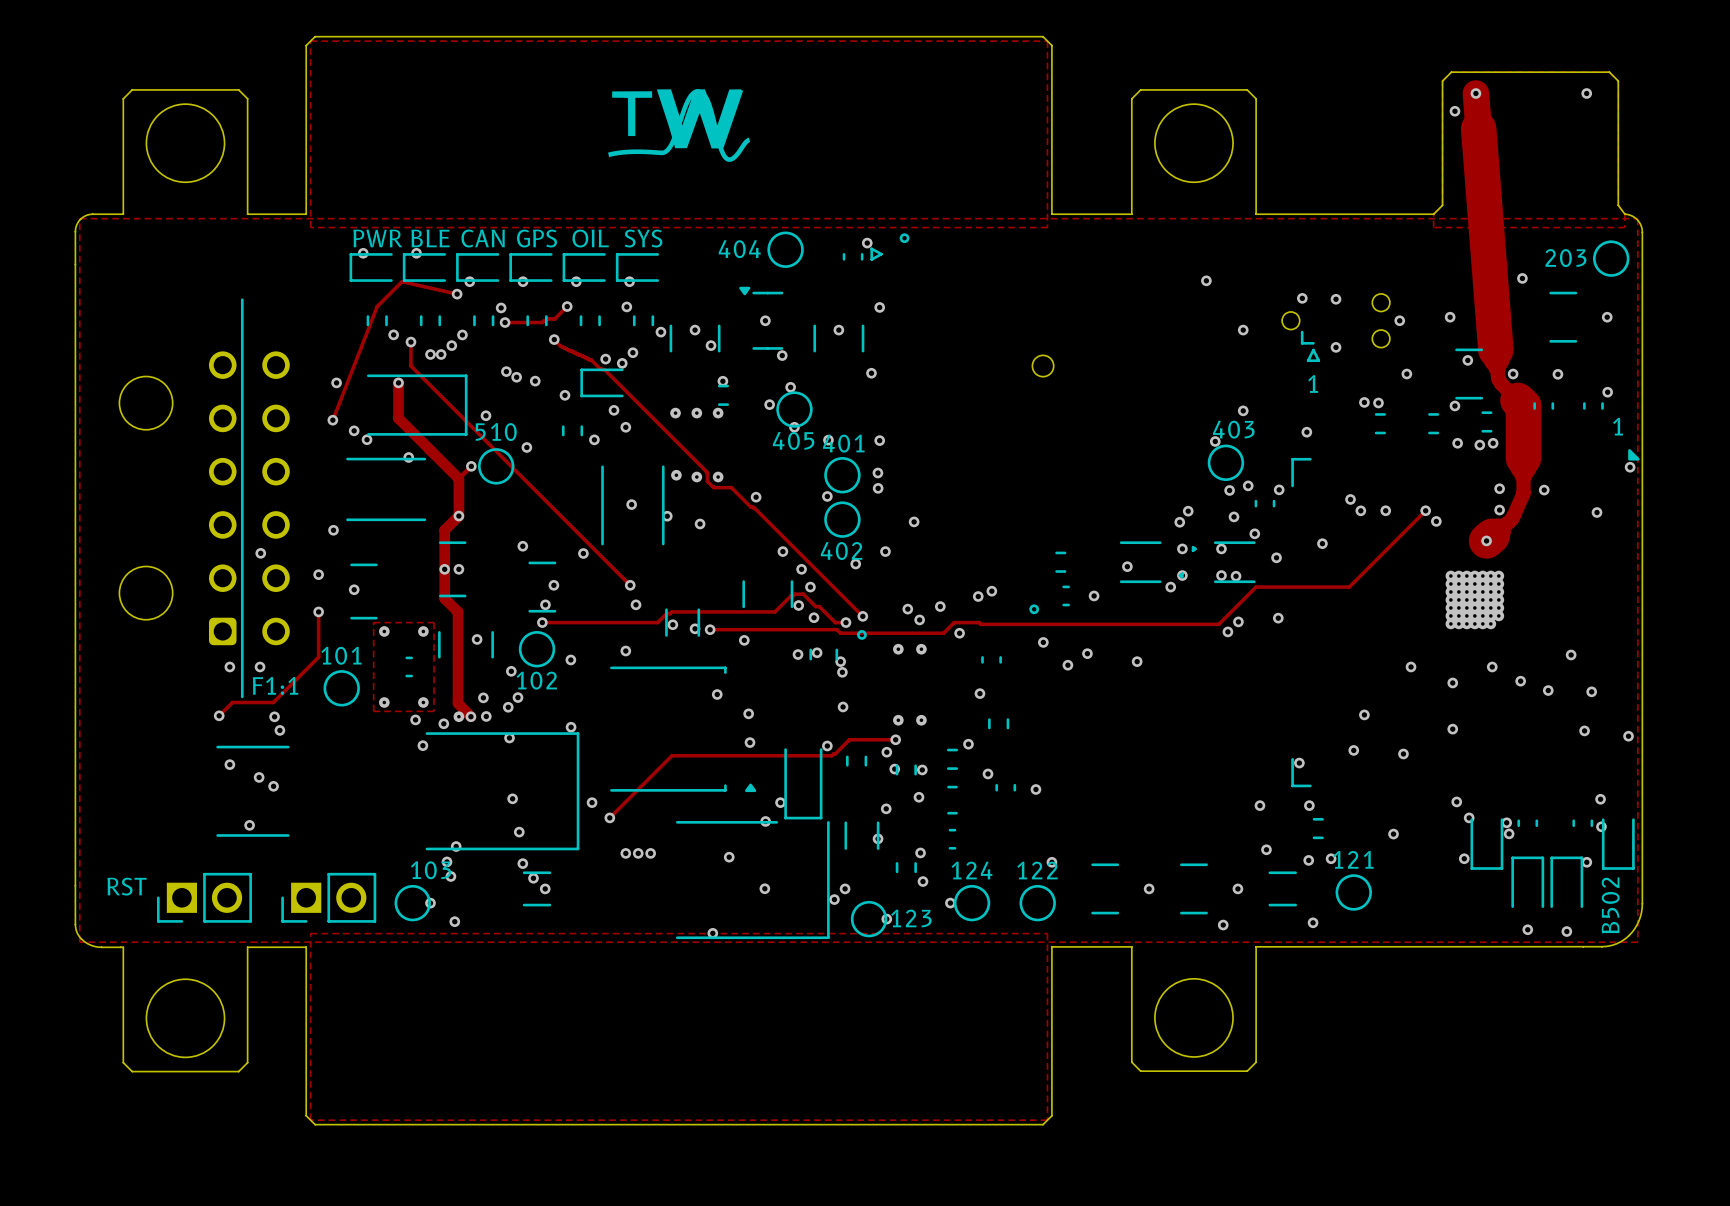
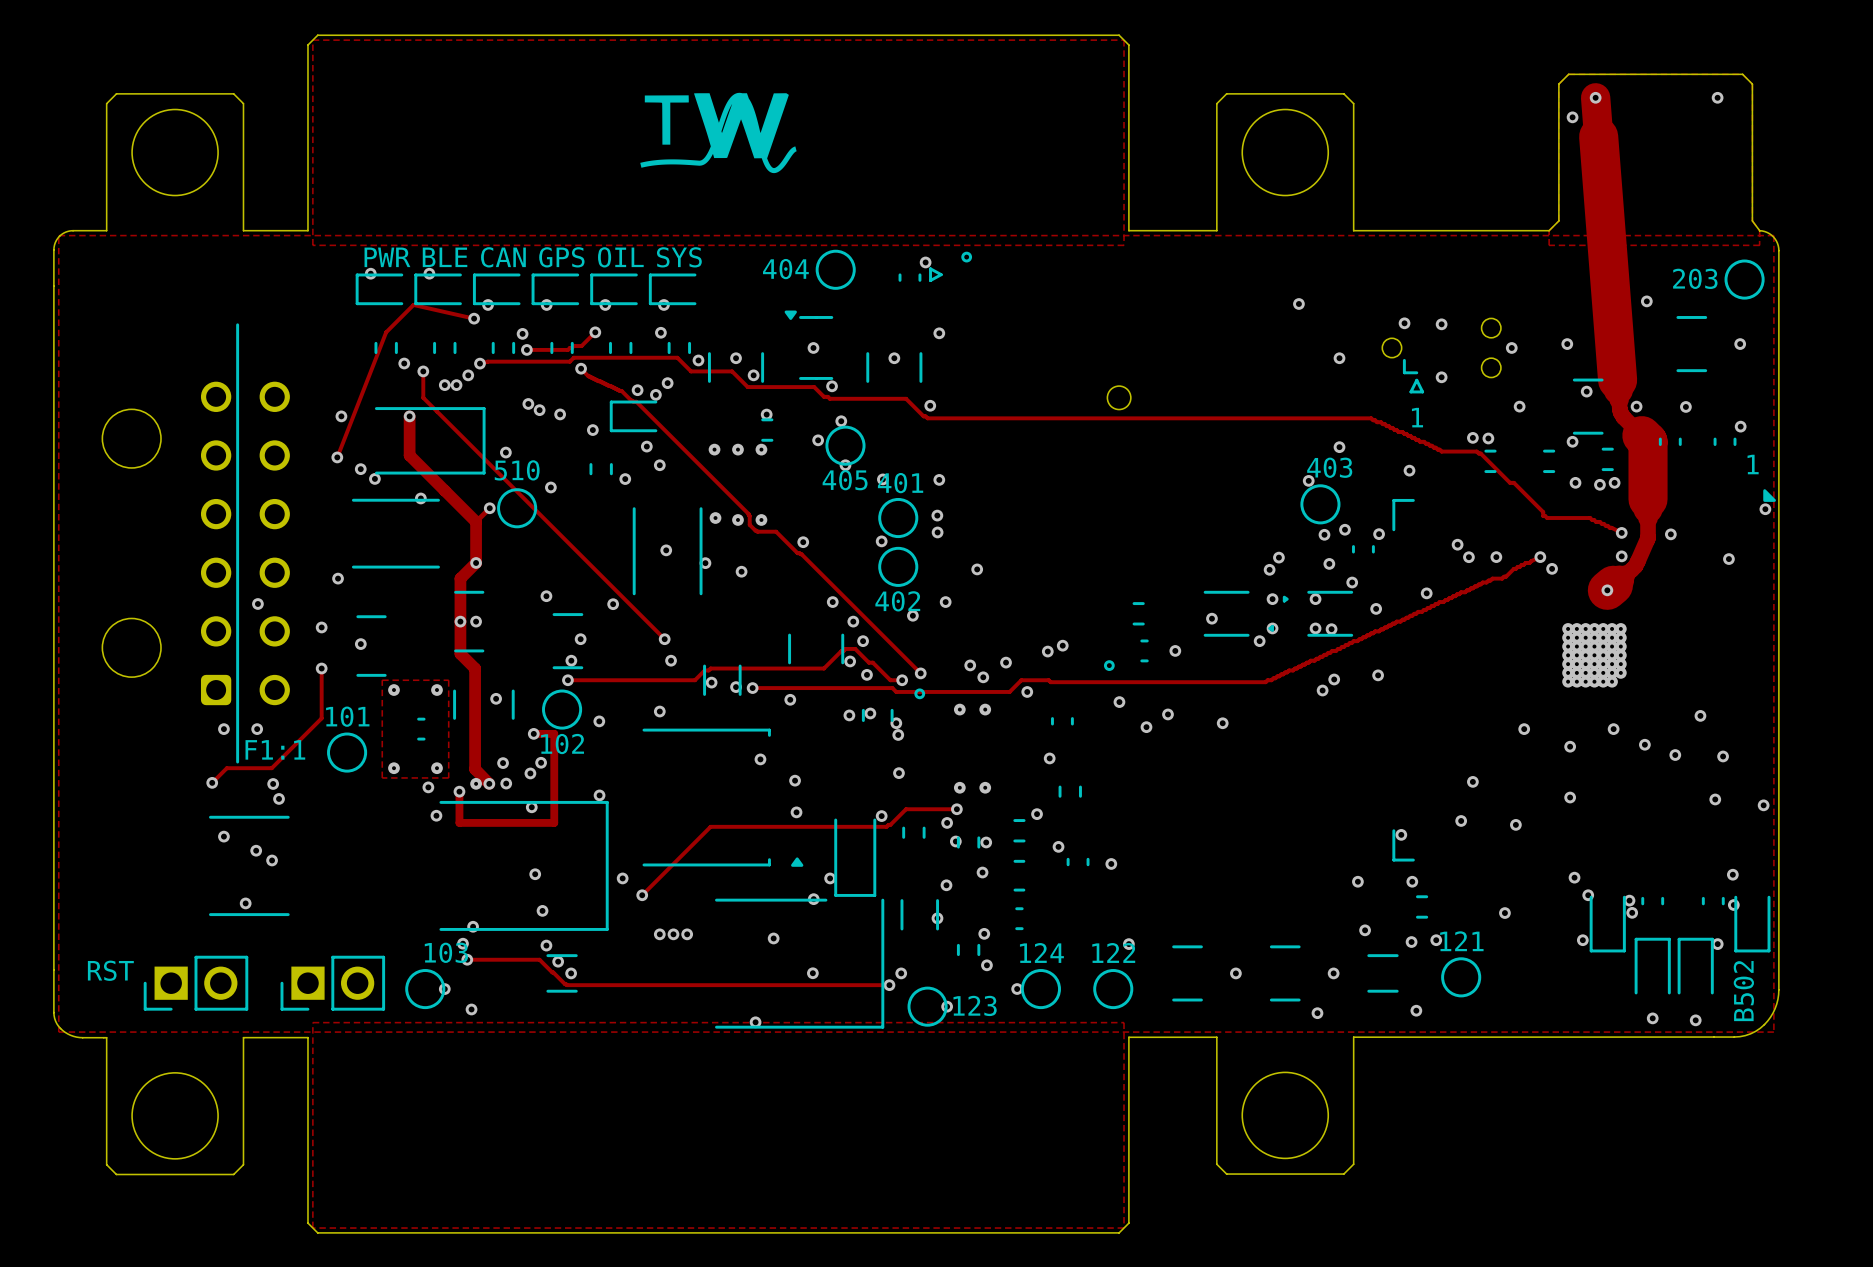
track: none -> (479, 363) (487, 361) (569, 361) (573, 357) (677, 357) (691, 371) (732, 371) (747, 387) (814, 387) (823, 396) (829, 398) (906, 398) (927, 418) (1371, 418) (1441, 451) (1476, 451) (1480, 453) (1510, 482) (1513, 482) (1547, 518) (1590, 518) (1619, 531)
track: (1425, 510) (1349, 587) (1259, 587) -> (1540, 557) (1513, 568) (1502, 578) (1492, 578) (1482, 582) (1357, 641)
track: (1254, 588) (1218, 624) (1176, 624) -> (1351, 643) (1265, 682)
track: none -> (533, 733) (554, 733) (554, 822) (459, 822) (459, 791)
track: none -> (467, 959) (539, 959) (566, 985) (889, 985)

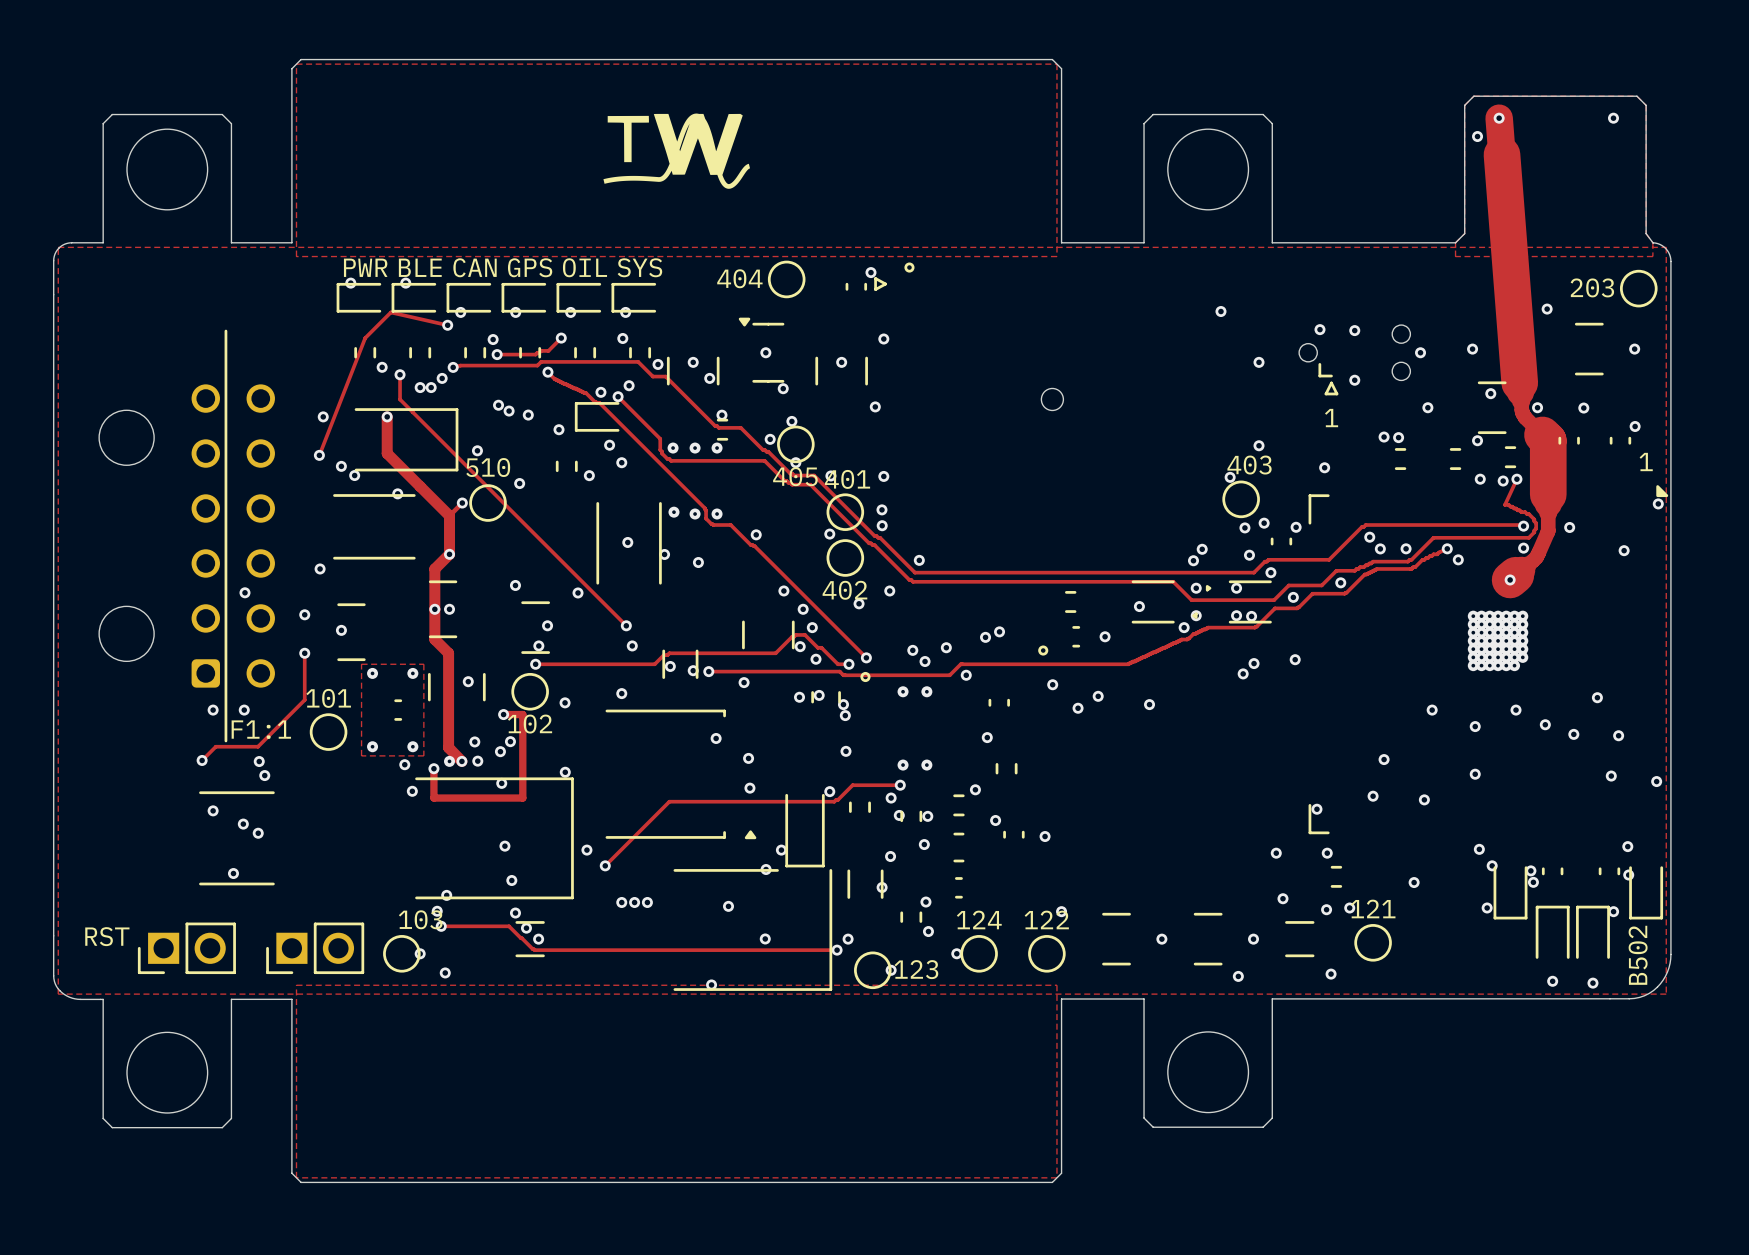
track: (691, 371) (732, 371) (747, 387) (814, 387) (823, 396) (829, 398) (906, 398) (927, 418) (1371, 418) (1441, 451) (1476, 451) (1480, 453) (1510, 482) (1513, 482) (1547, 518) (1590, 518) (1619, 531) -> (651, 374) (652, 376) (665, 376) (715, 426) (718, 427) (740, 427) (790, 473) (794, 475) (814, 475) (874, 536) (880, 537) (914, 572) (1253, 572) (1268, 559) (1329, 559) (1365, 525) (1521, 525)
track: none -> (618, 396) (660, 438) (660, 449) (671, 460) (764, 460) (784, 481) (792, 484) (810, 484) (869, 543) (874, 545) (913, 581) (1173, 581) (1191, 600) (1274, 600) (1288, 585) (1321, 585) (1336, 570) (1354, 570) (1373, 561) (1407, 561) (1433, 537) (1528, 537) (1536, 528) (1534, 519) (1528, 514) (1505, 504) (1516, 479)
track: (1492, 578) (1265, 682) (1050, 682) (1048, 680) -> (1402, 568) (1376, 568) (1364, 574) (1344, 593) (1312, 593) (1297, 608) (1275, 608) (1254, 627) (1208, 627) (1193, 634) (1187, 639) (1181, 639) (1128, 664) (986, 664)

